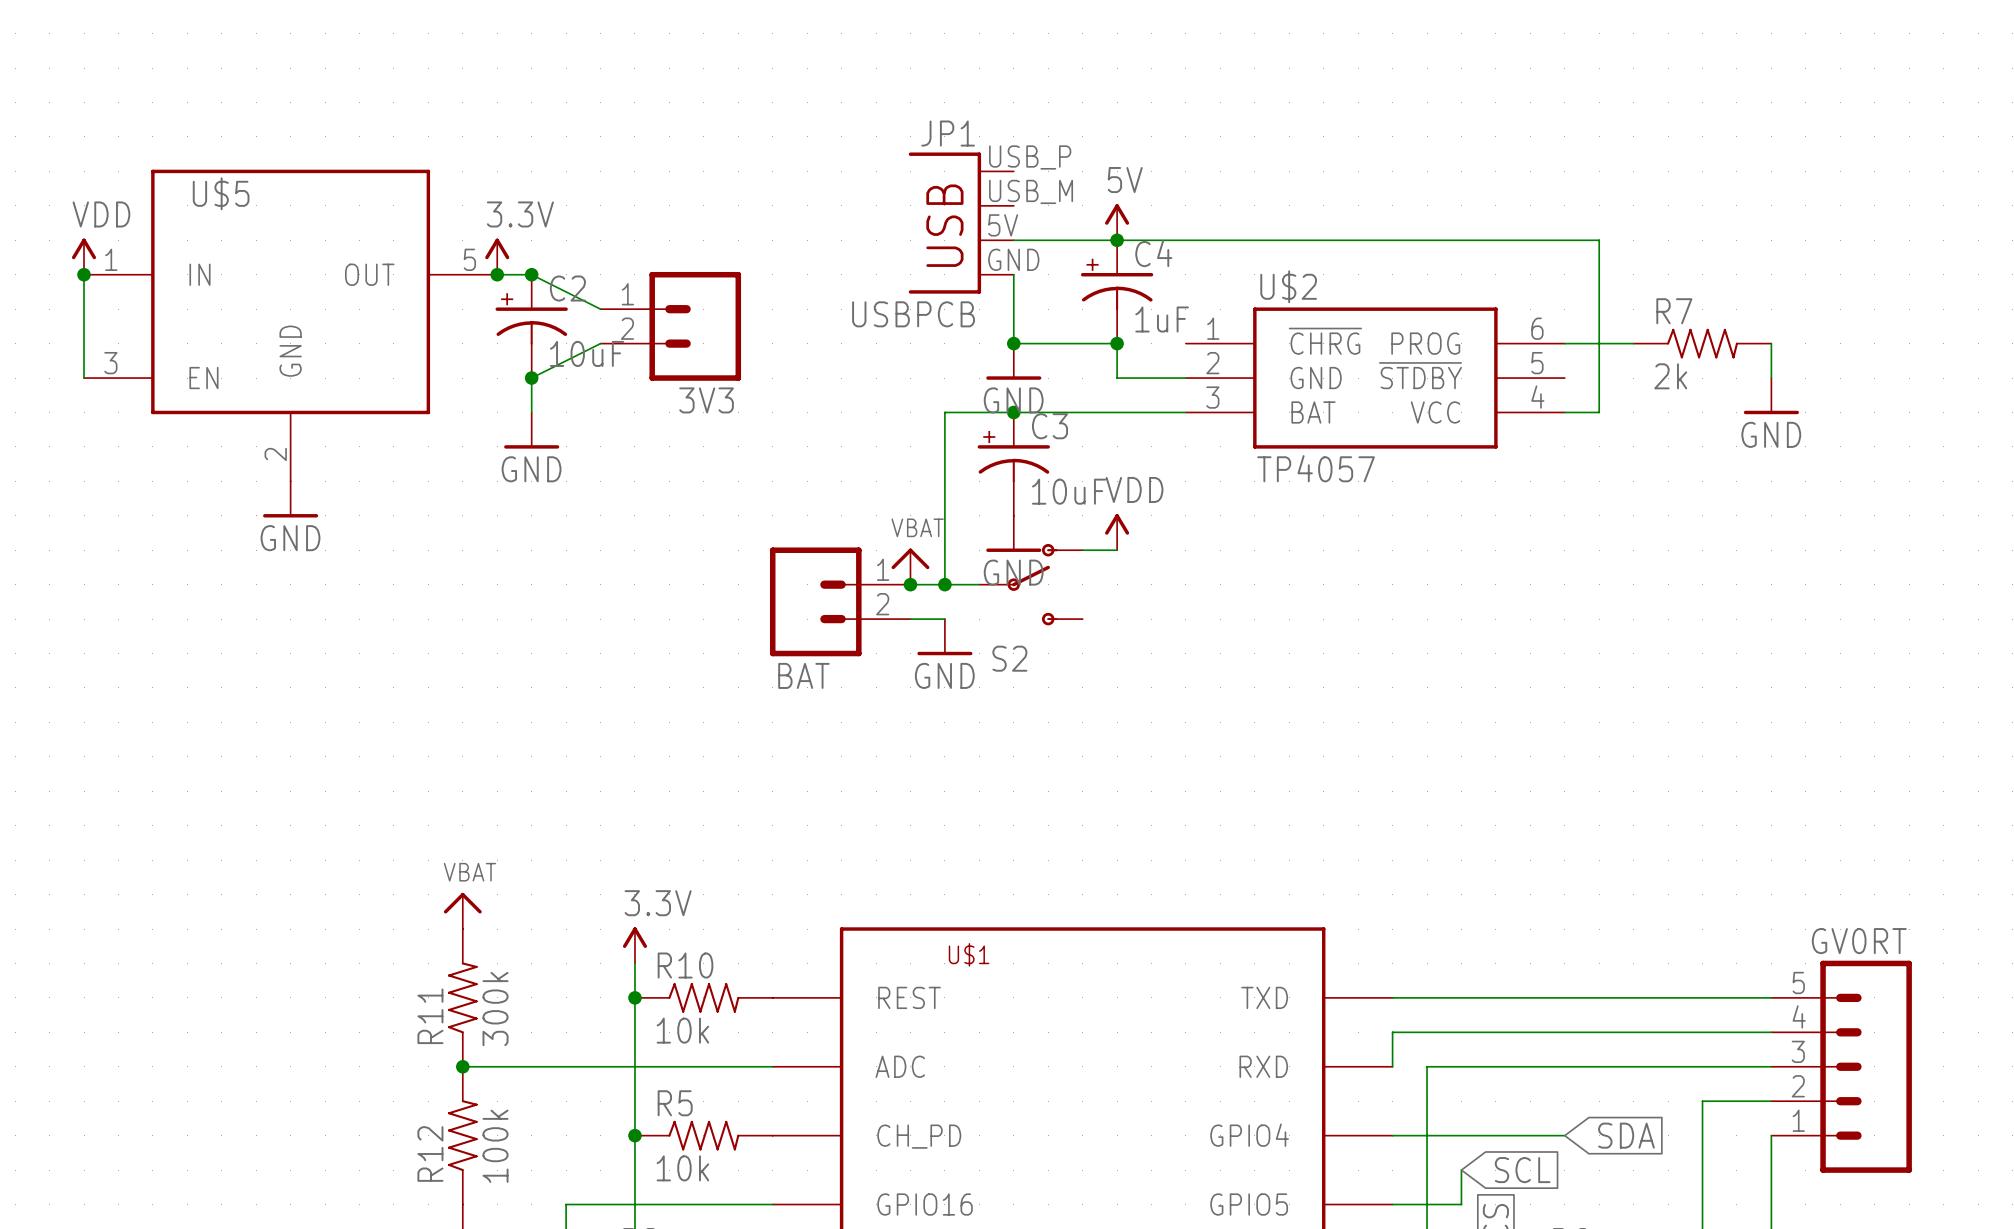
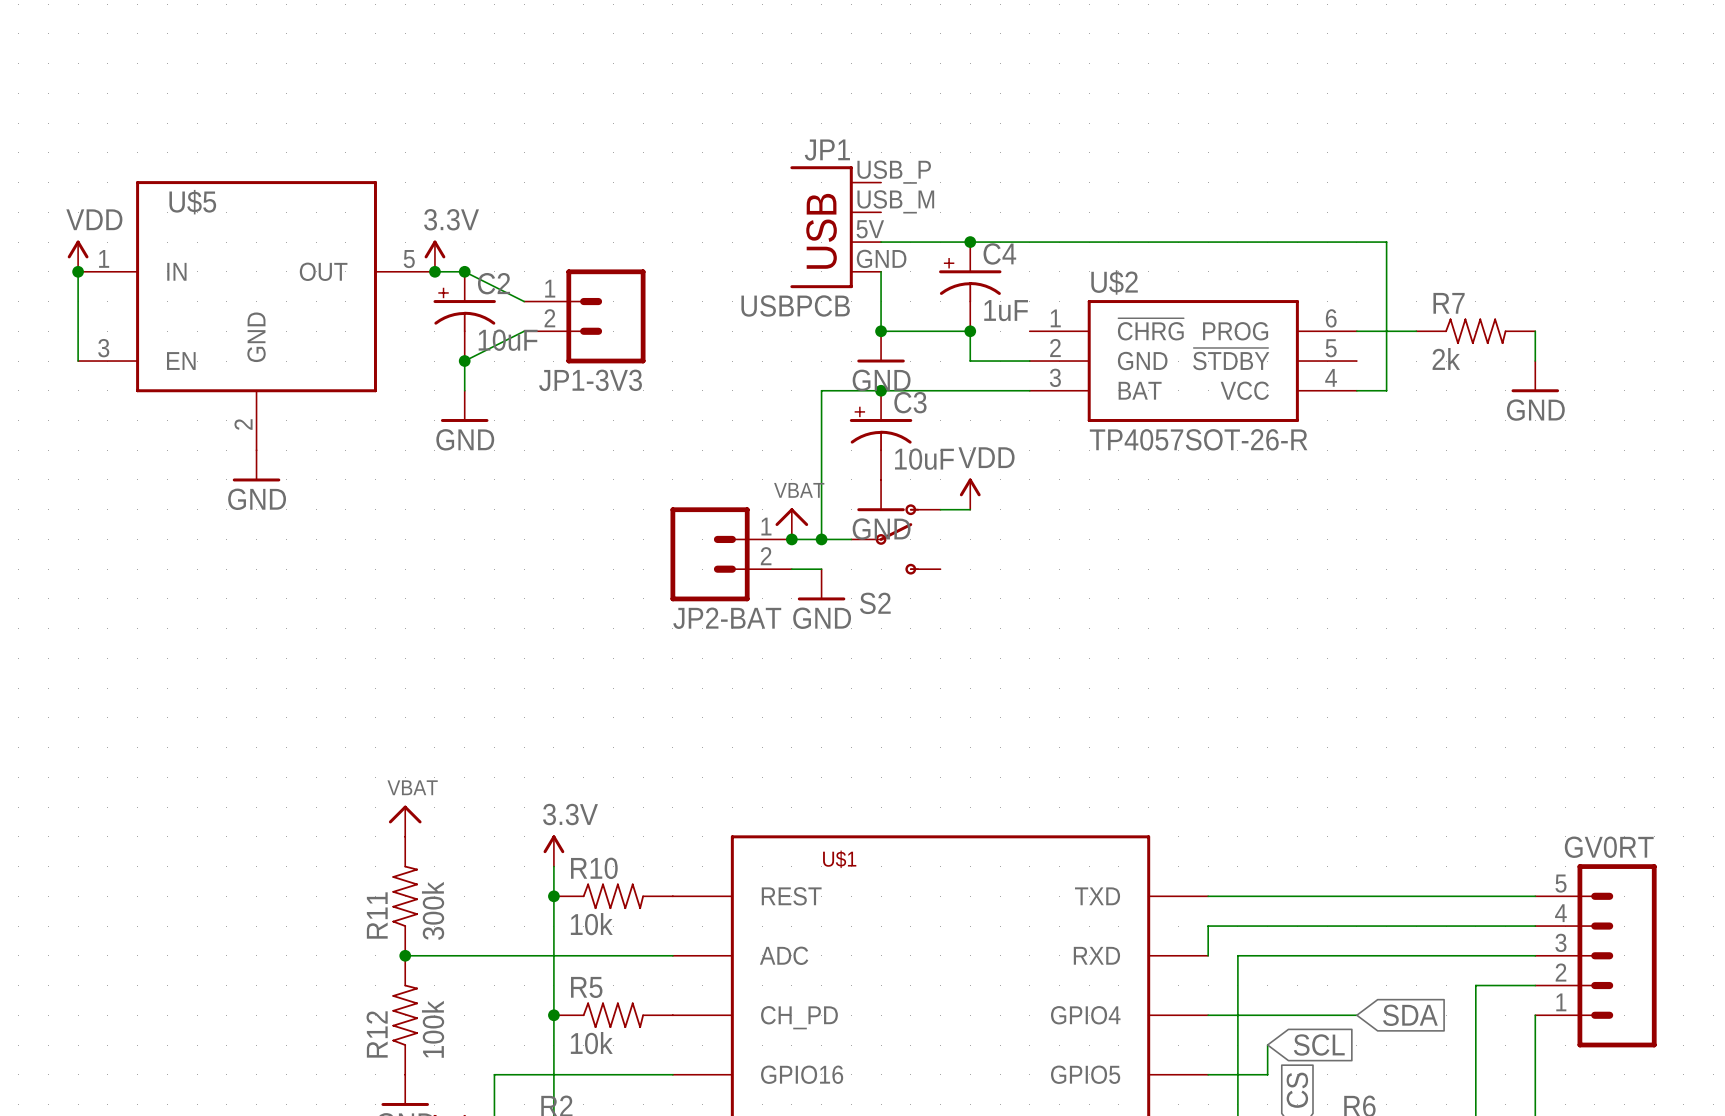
power symbol: 5V (1117, 222) -> none
3V3 name: 3V3 (706, 400) -> JP1-3V3 (590, 380)
U$2 value: TP4057 (1316, 468) -> TP4057SOT-26-R (1198, 439)
BAT name: BAT (803, 675) -> JP2-BAT (727, 618)

